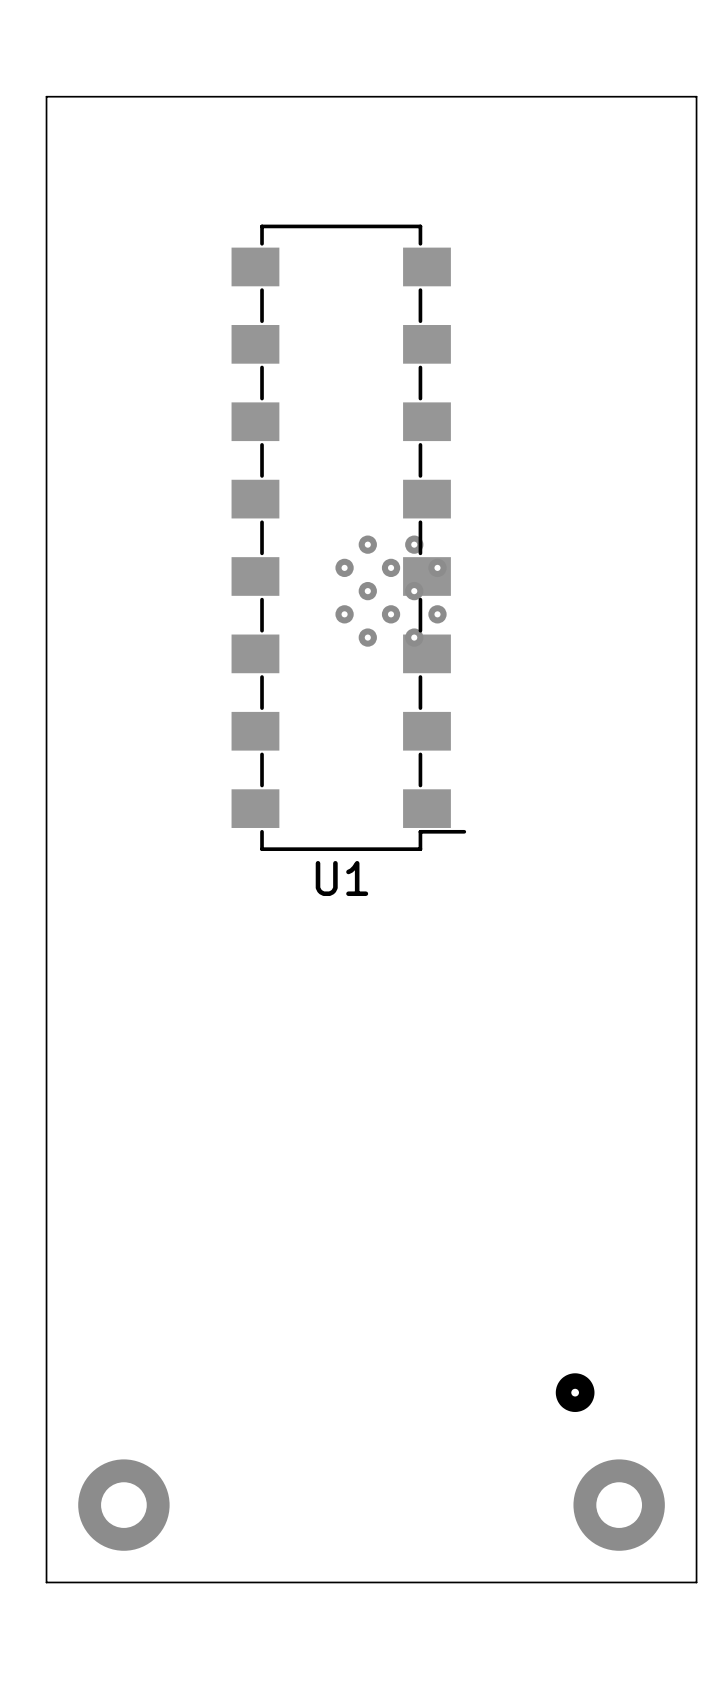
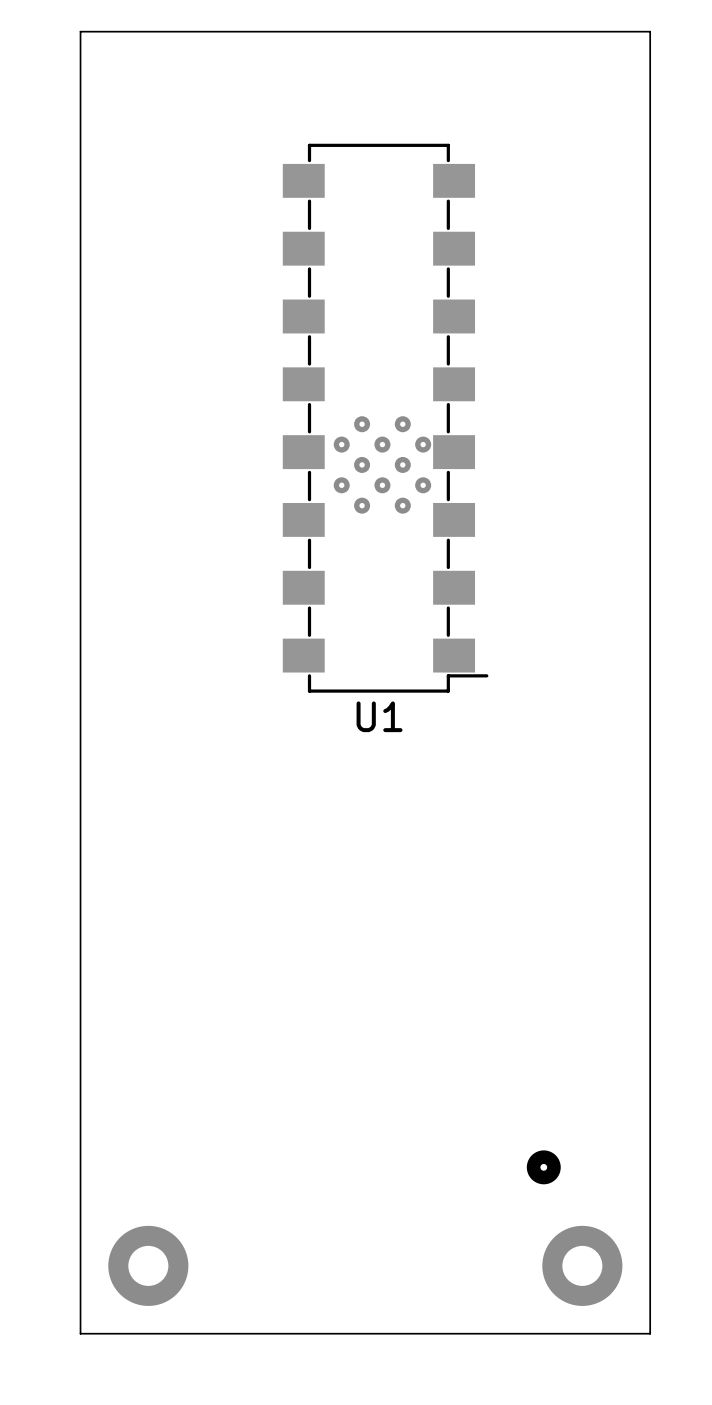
U1 position: (348, 537) -> (385, 418)

